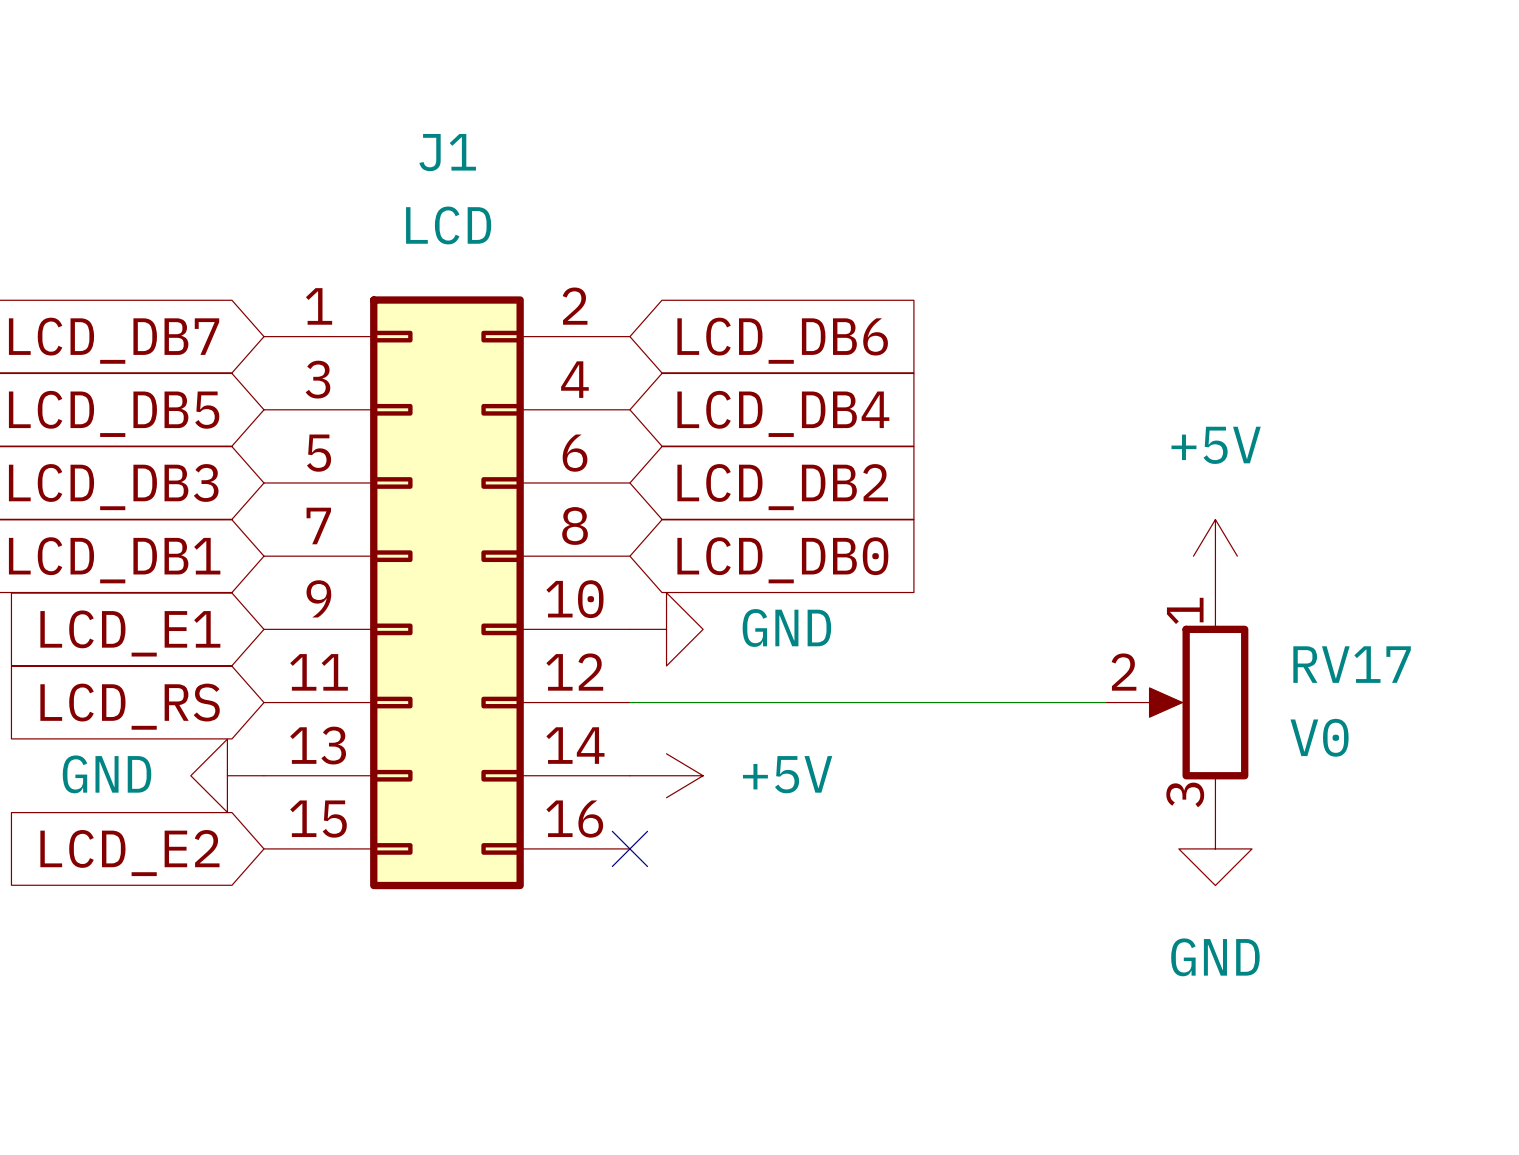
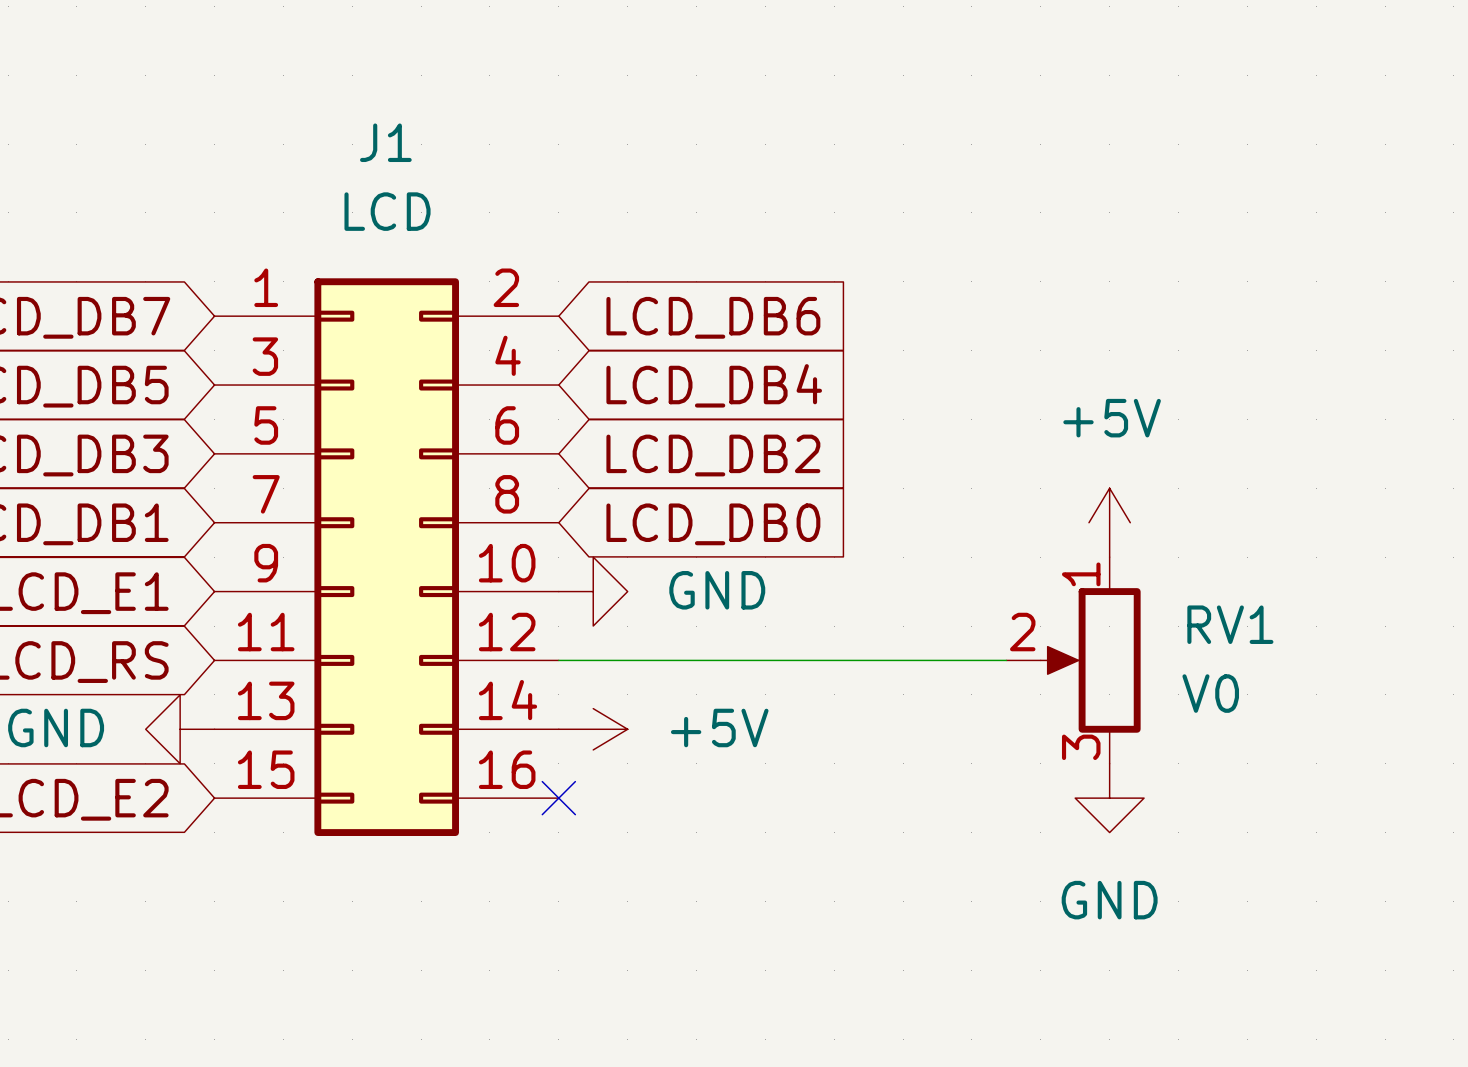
RV17 name: RV17 (1352, 664) -> RV1 (1230, 624)

